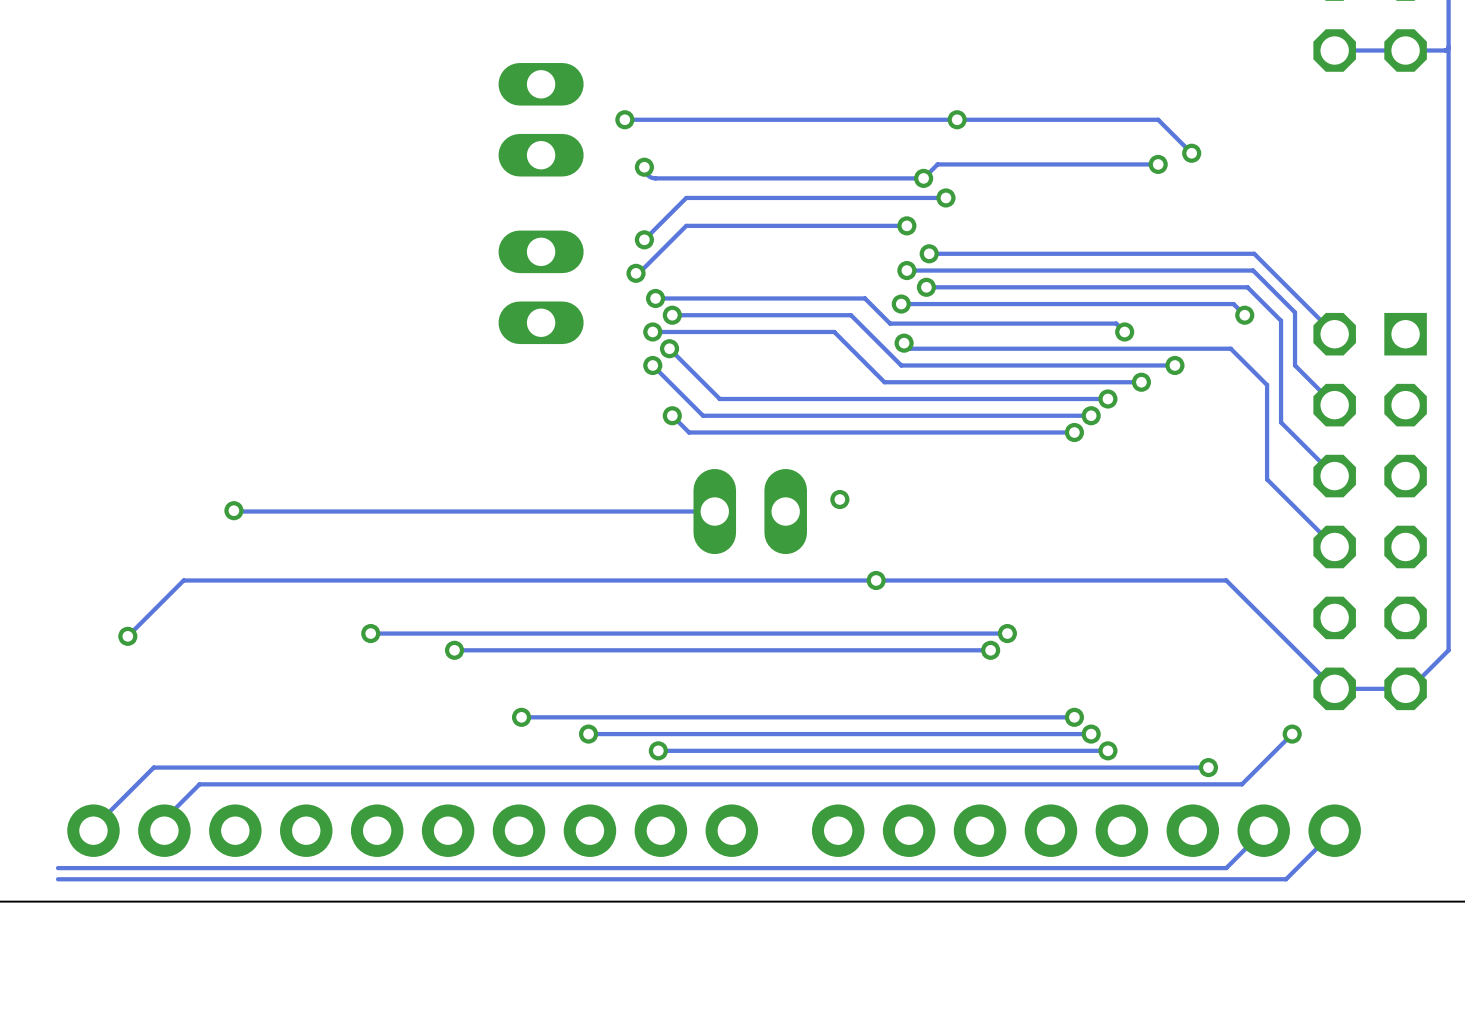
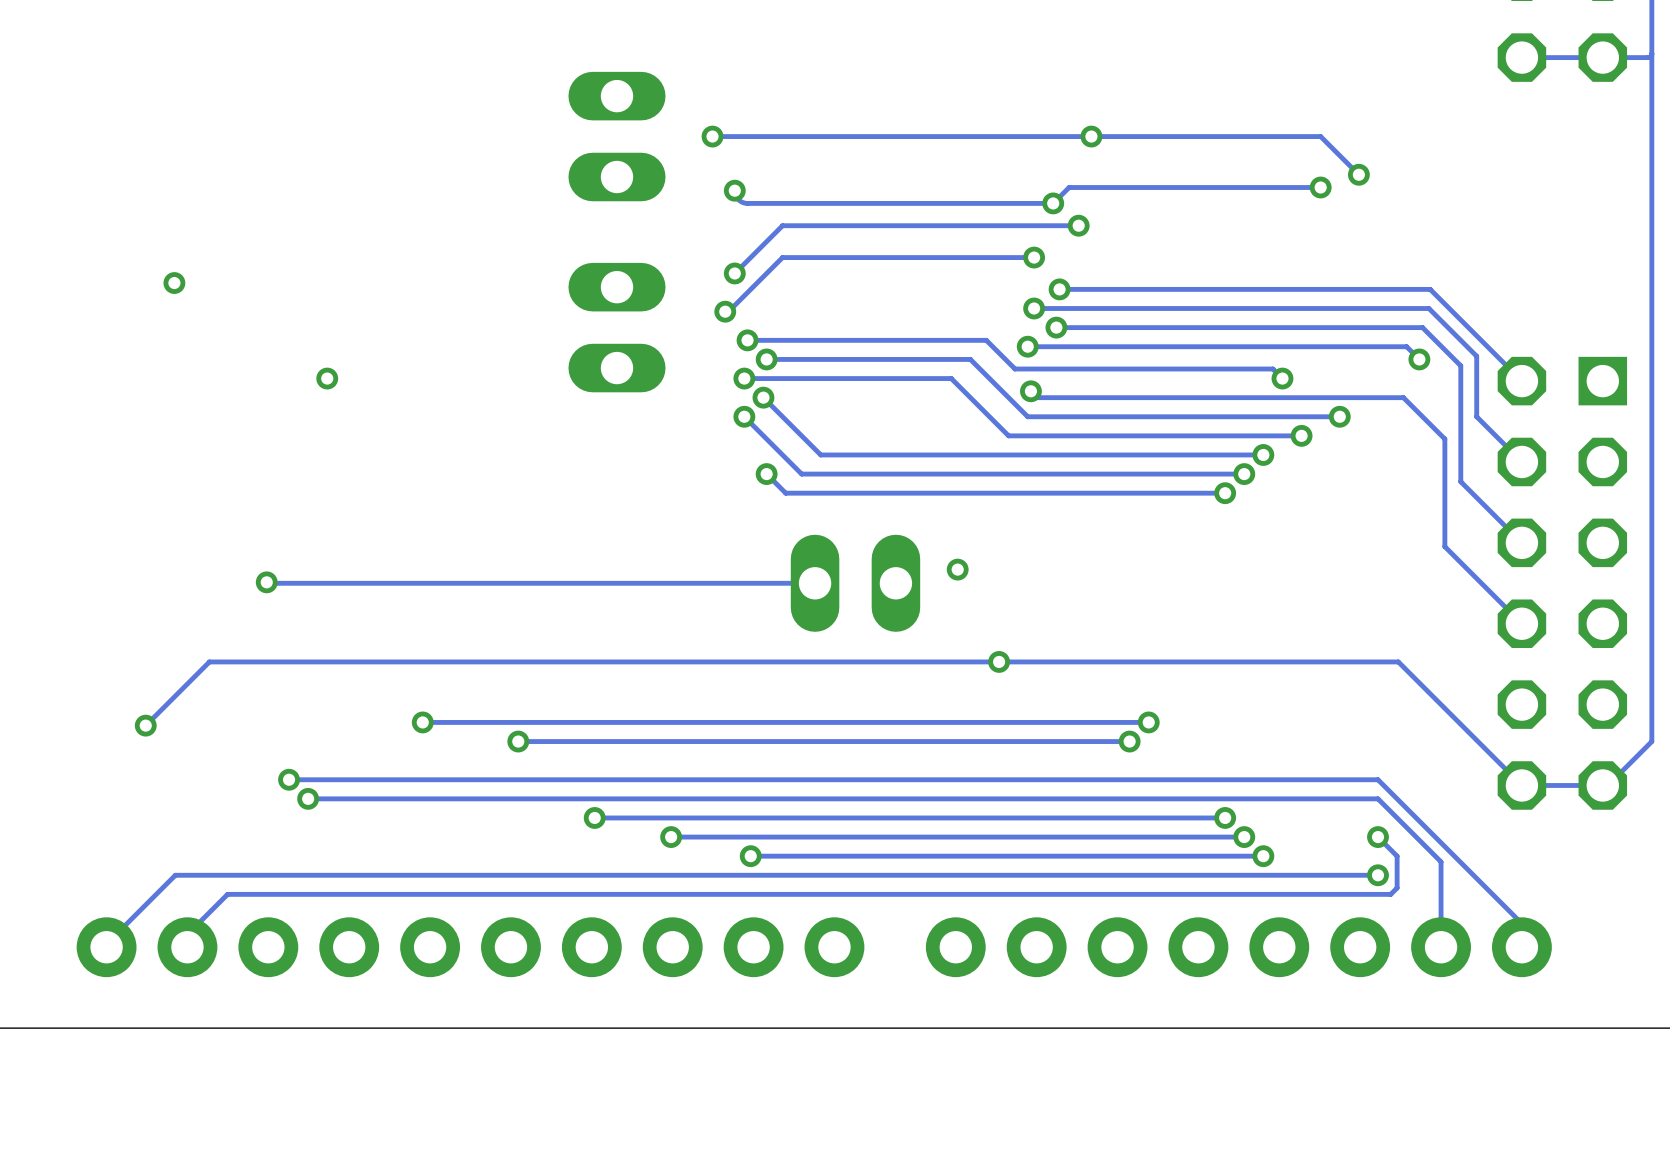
via: none -> (174, 283)
via: none -> (327, 378)
via: none -> (289, 779)
via: none -> (308, 798)
track: (1292, 734) (1241, 784) (1219, 784) -> (1378, 837) (1397, 856) (1397, 888) (1390, 894)
via position: (1292, 734) -> (1378, 837)
track: (1263, 830) (1226, 868) (58, 868) -> (1441, 947) (1441, 861) (1378, 798) (308, 798)
track: (1334, 830) (1286, 879) (58, 879) -> (1521, 947) (1521, 923) (1378, 779) (289, 779)

